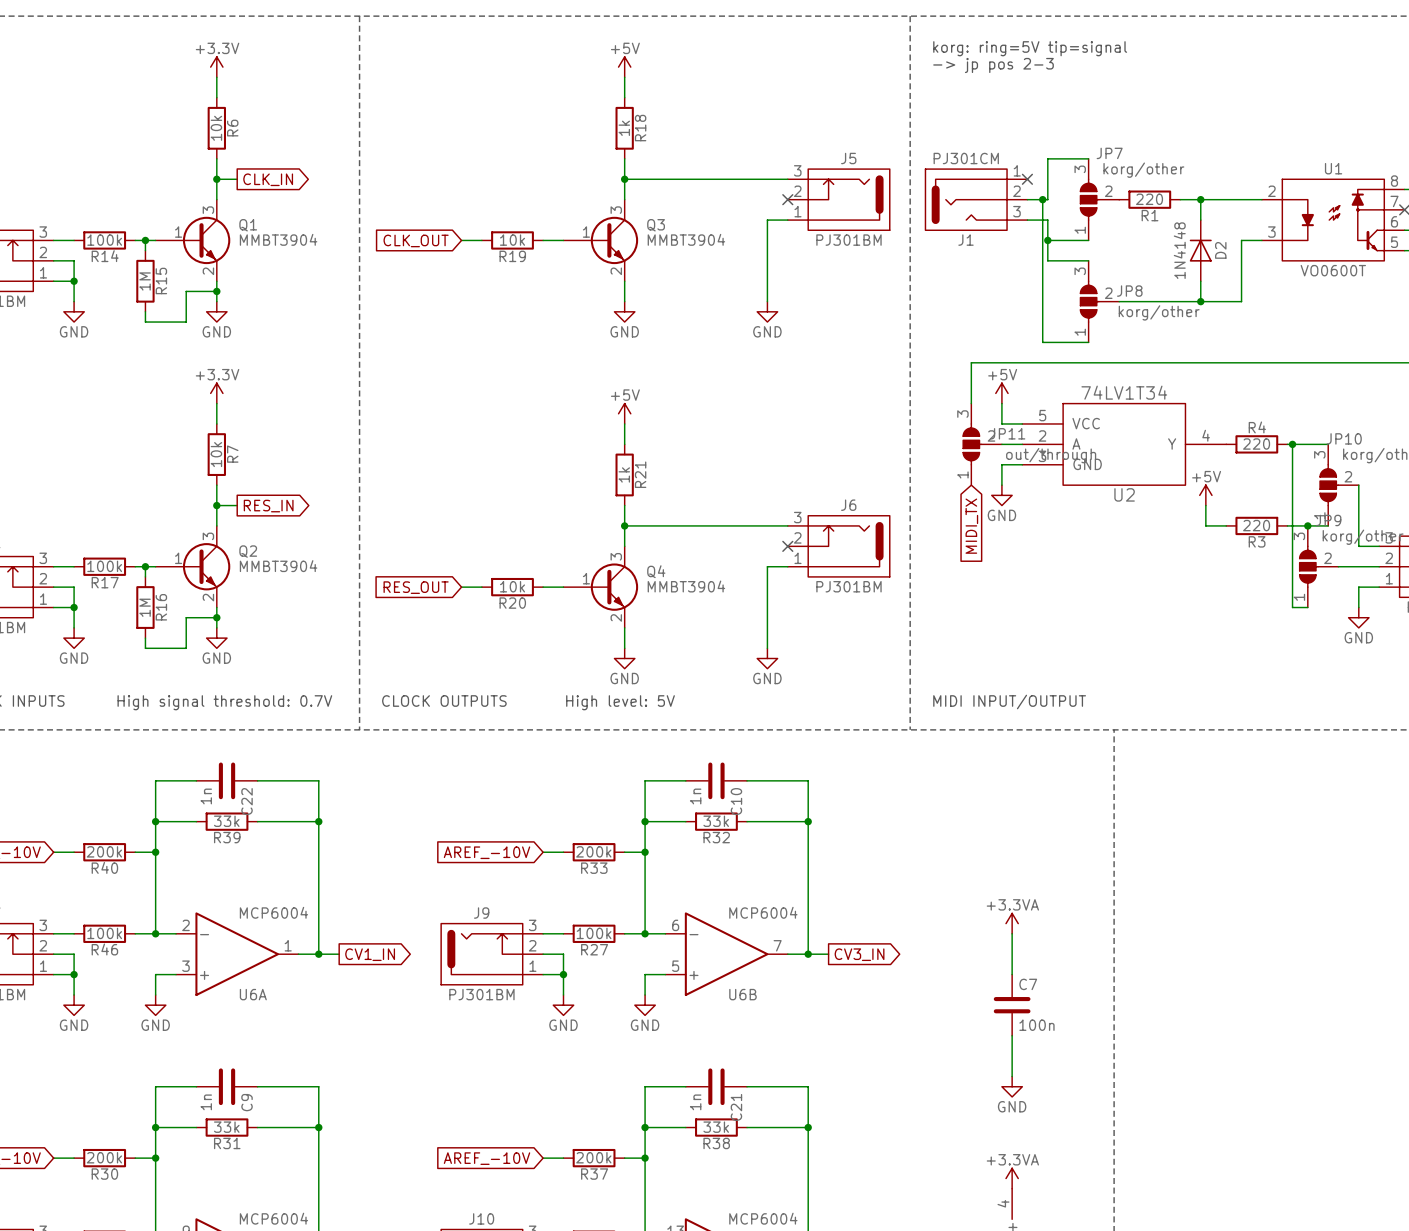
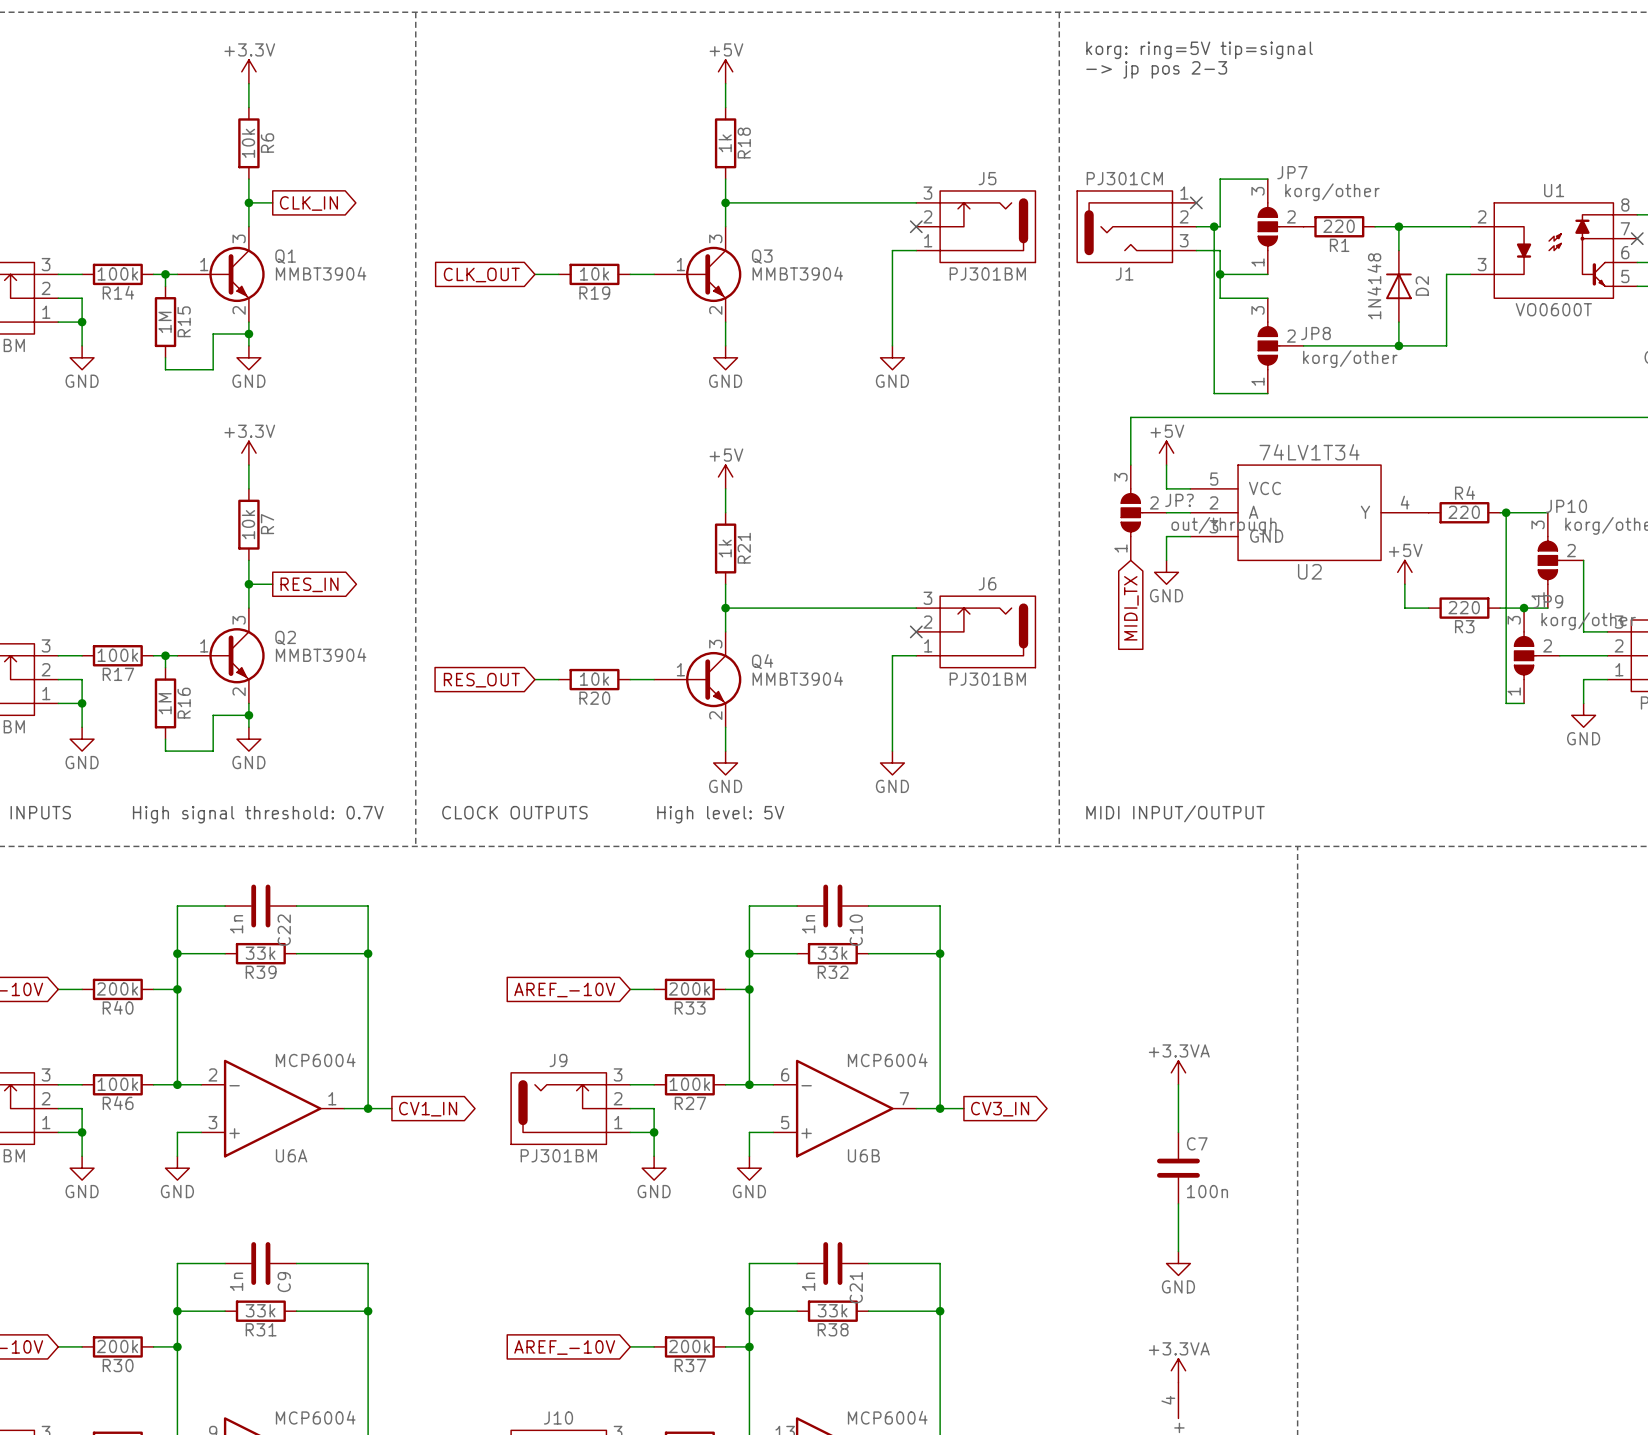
JP11 name: JP11 (1007, 433) -> JP? (1179, 500)

